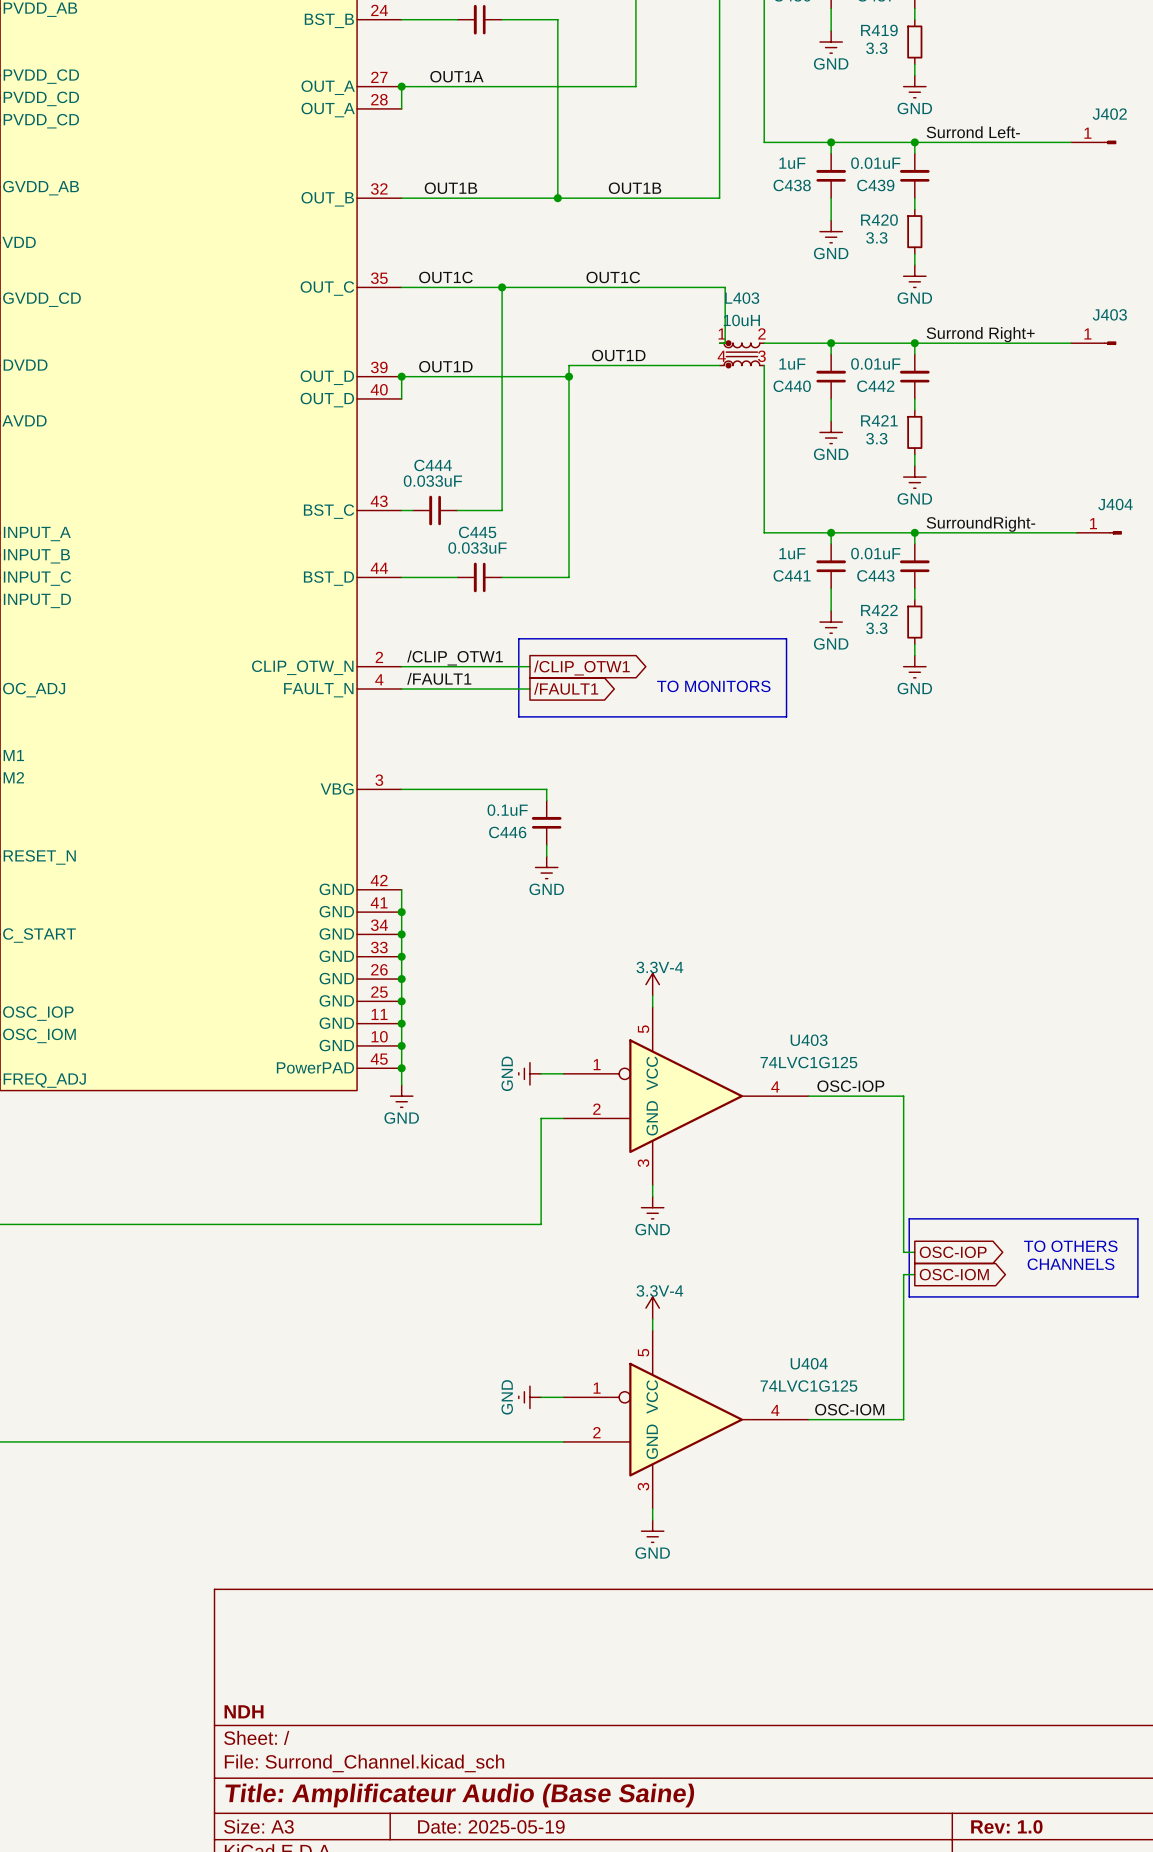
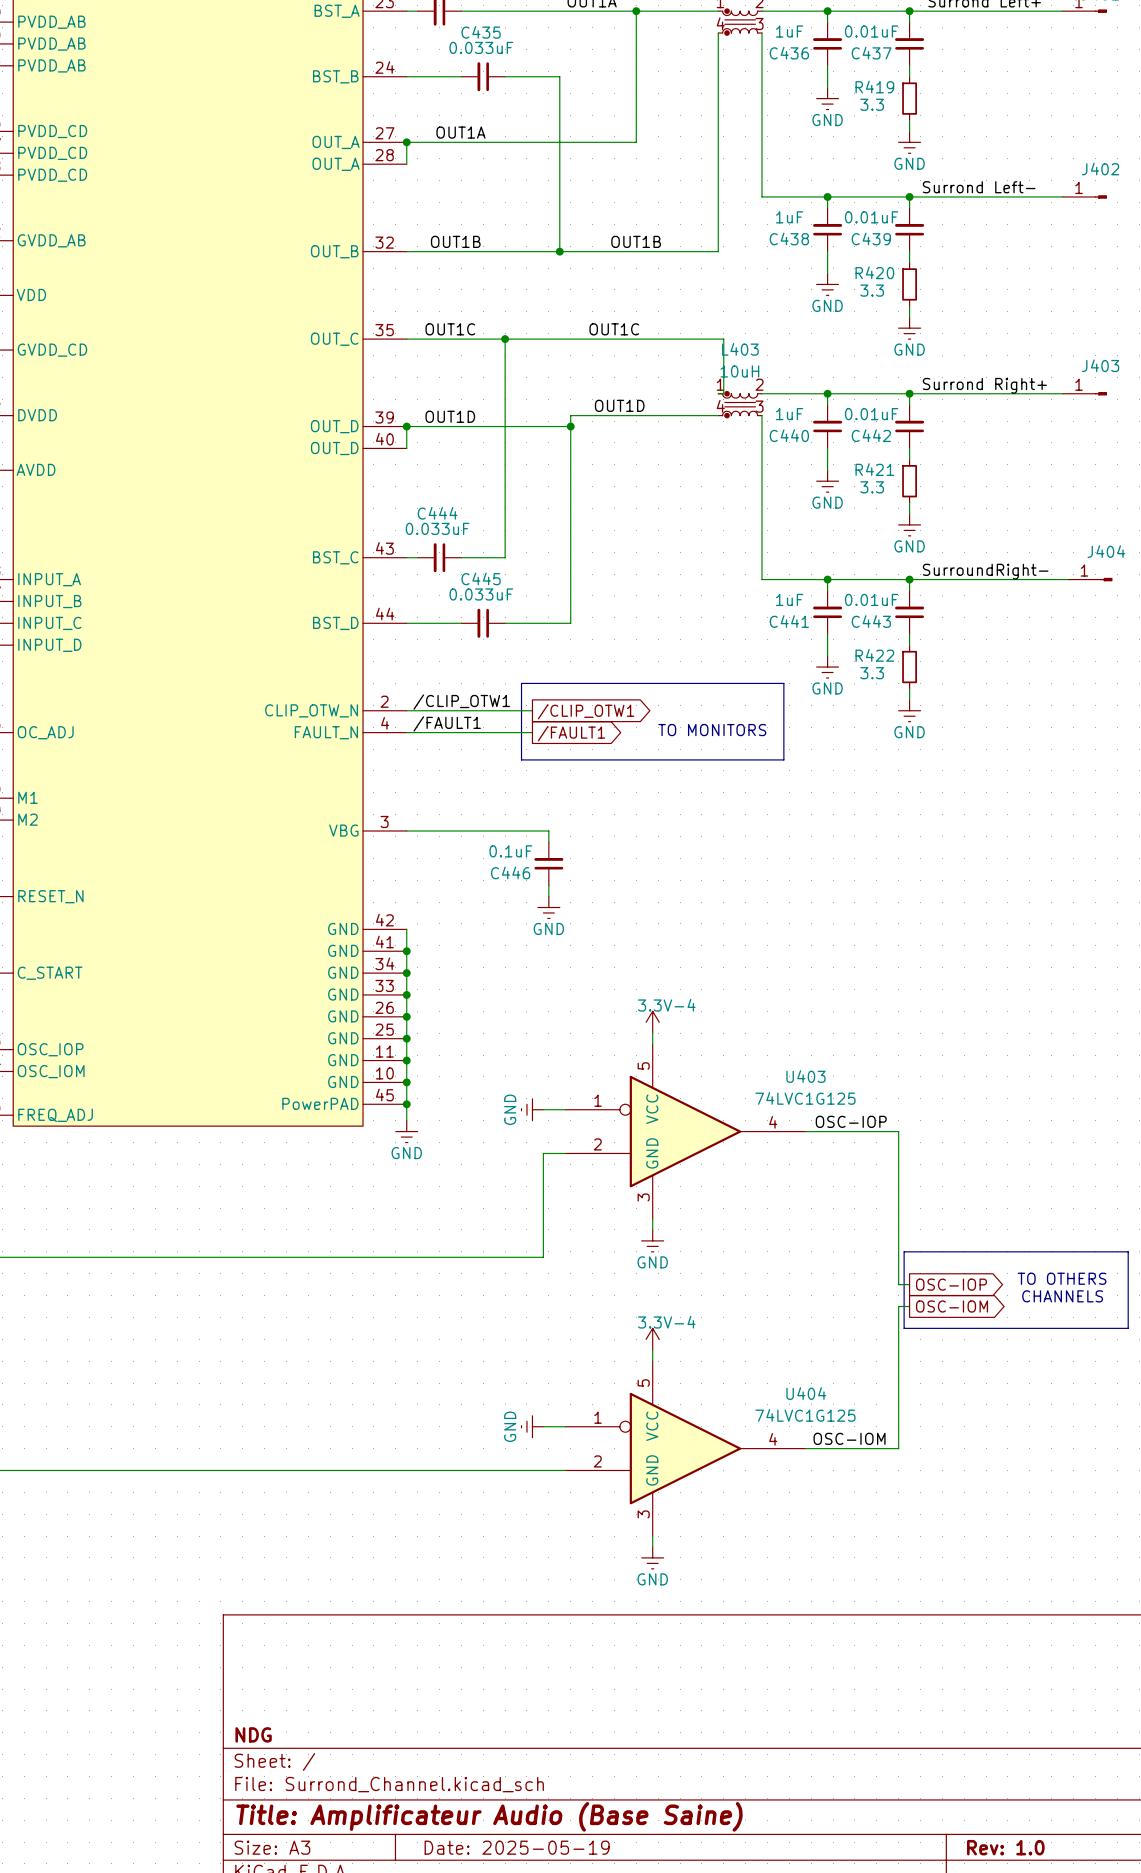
title block: NDH (244, 1711) -> NDG (253, 1734)

